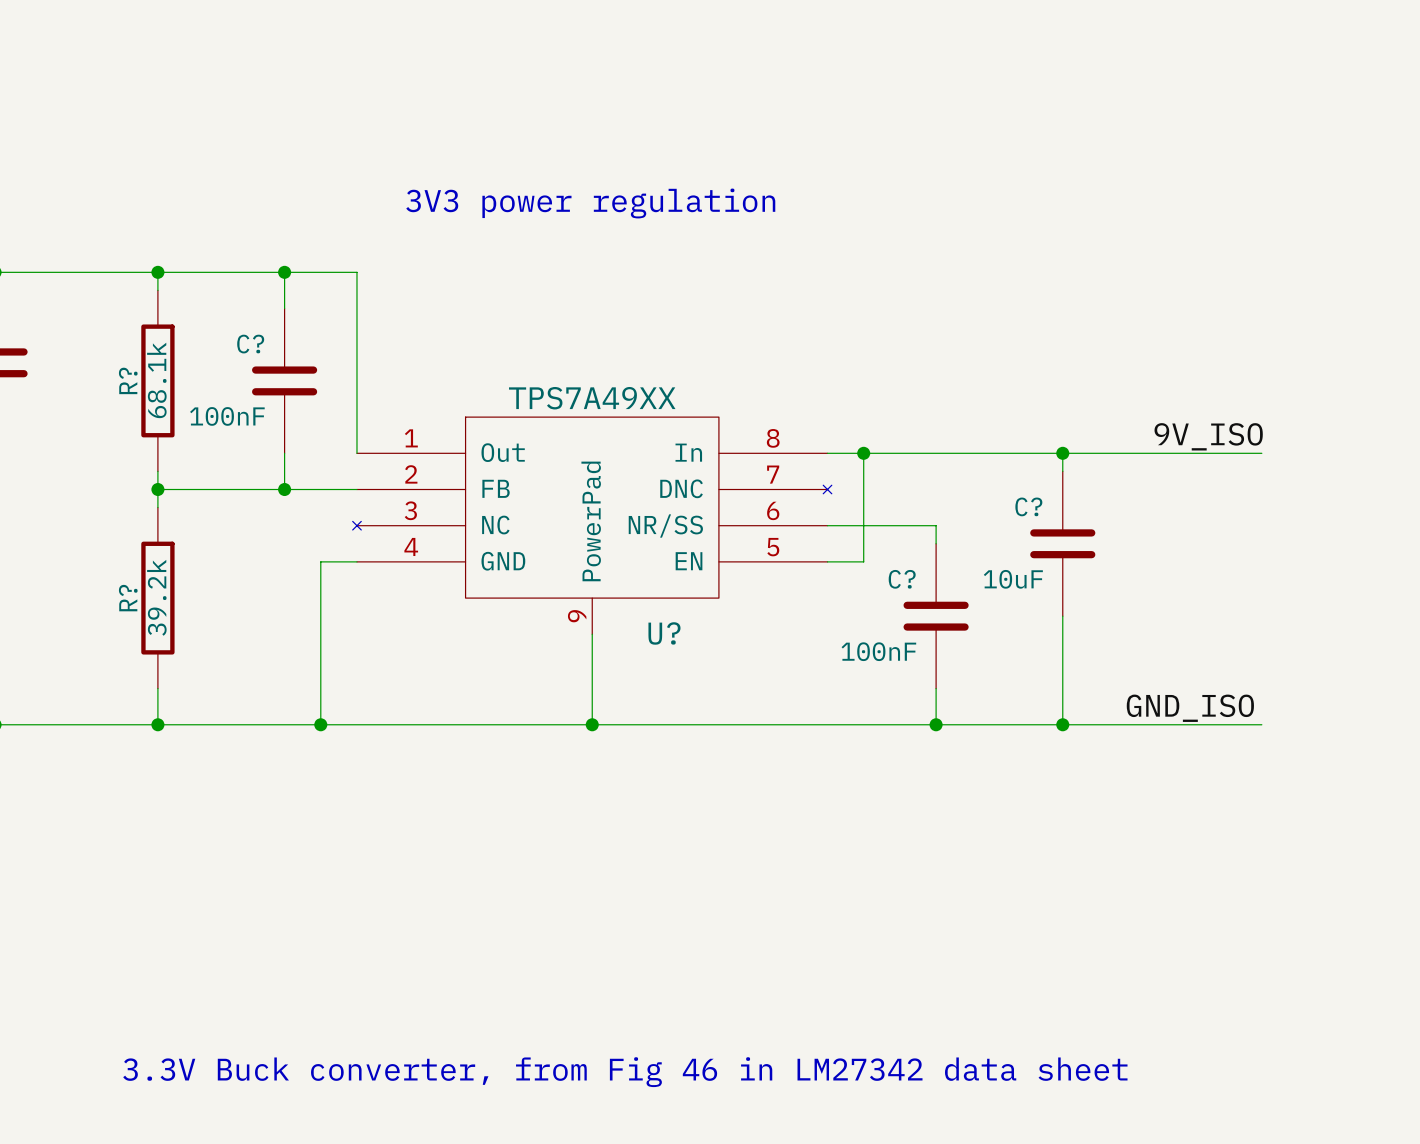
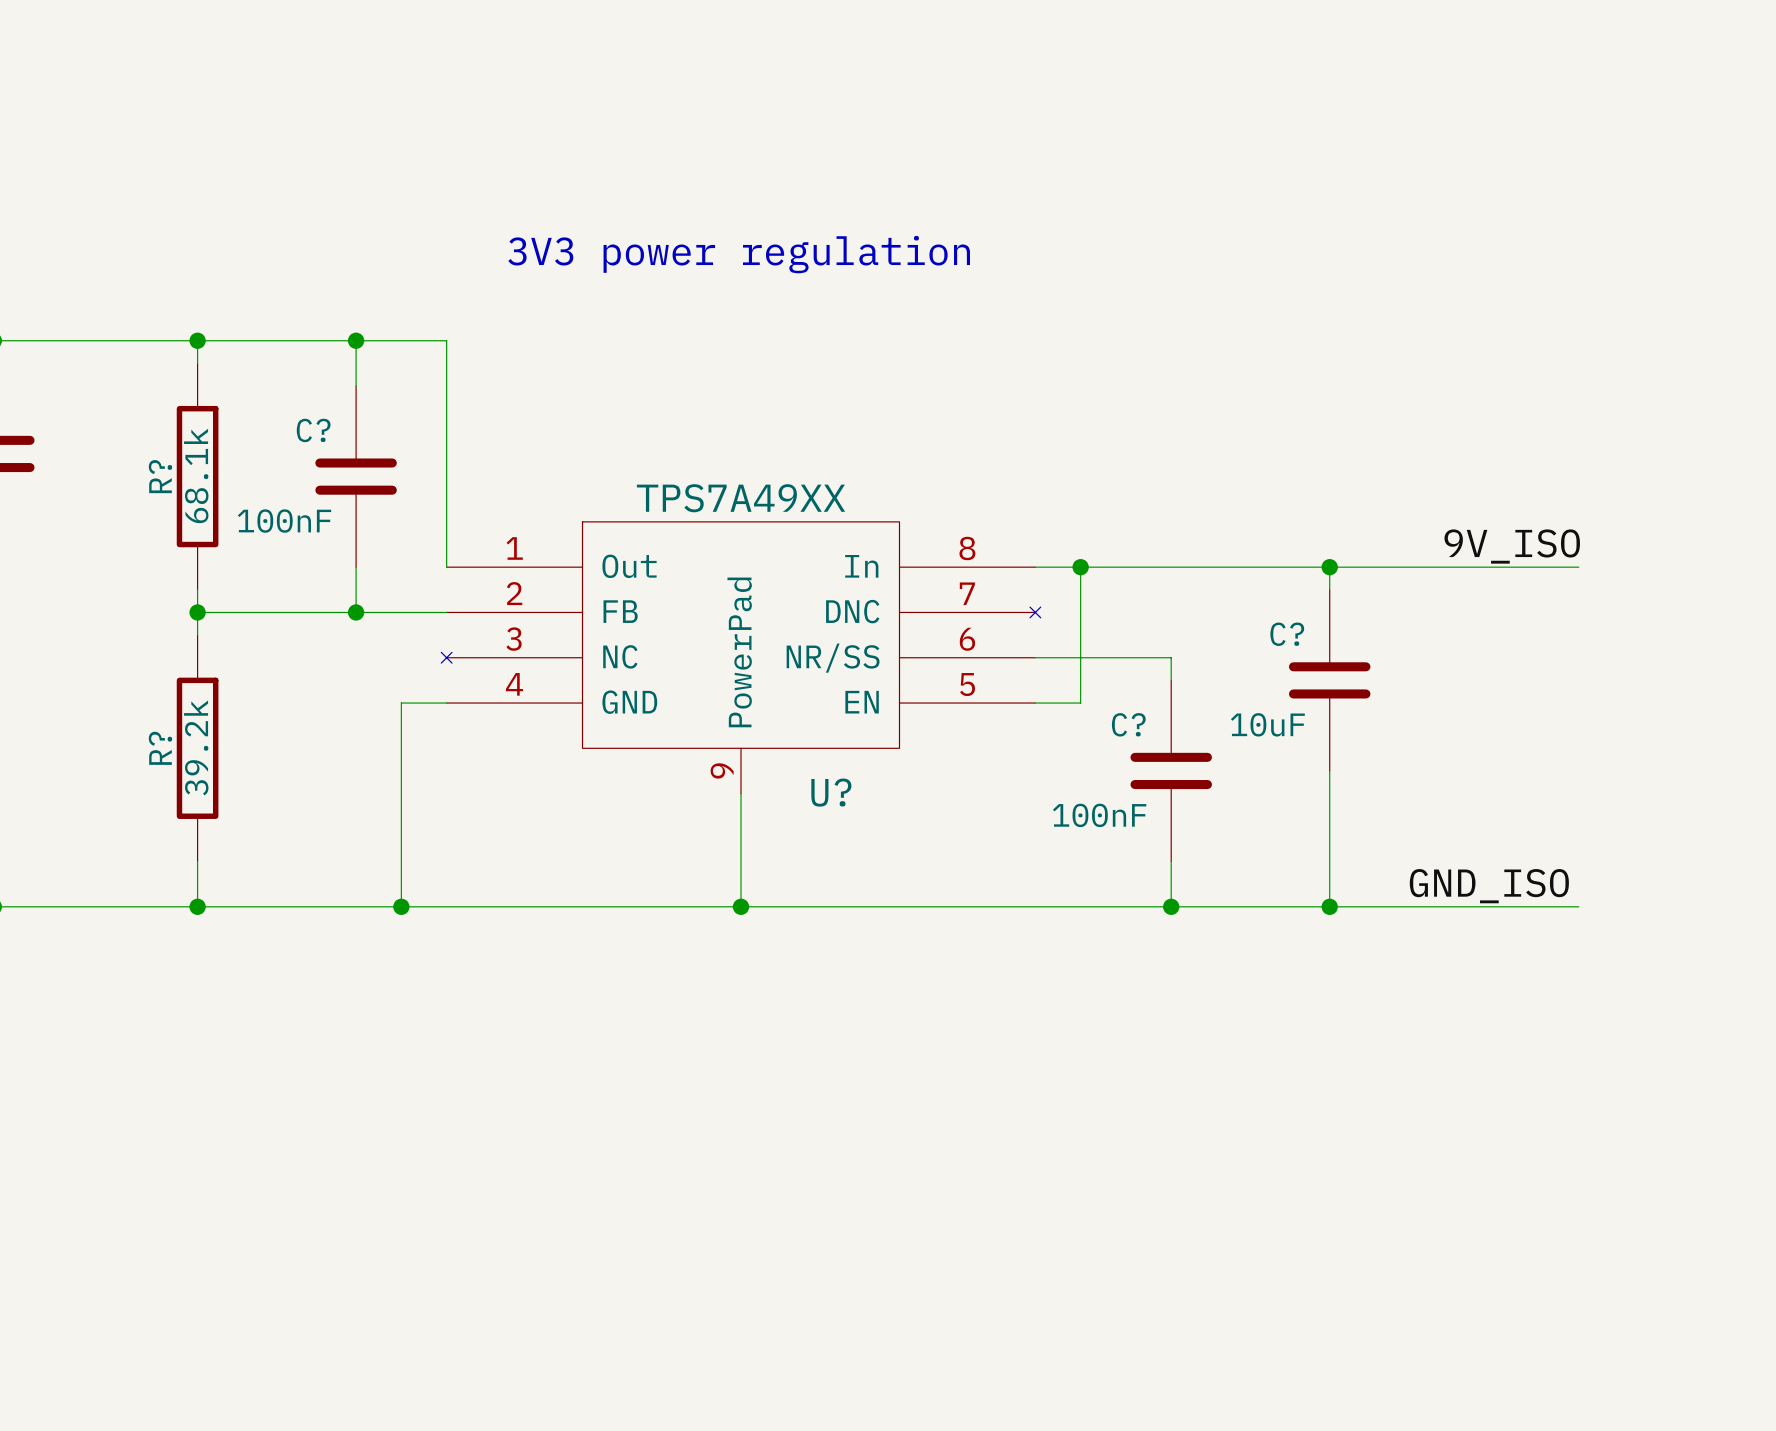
text: 3.3V Buck converter, from Fig 46 in LM27342 data sheet (625, 1072) -> none

